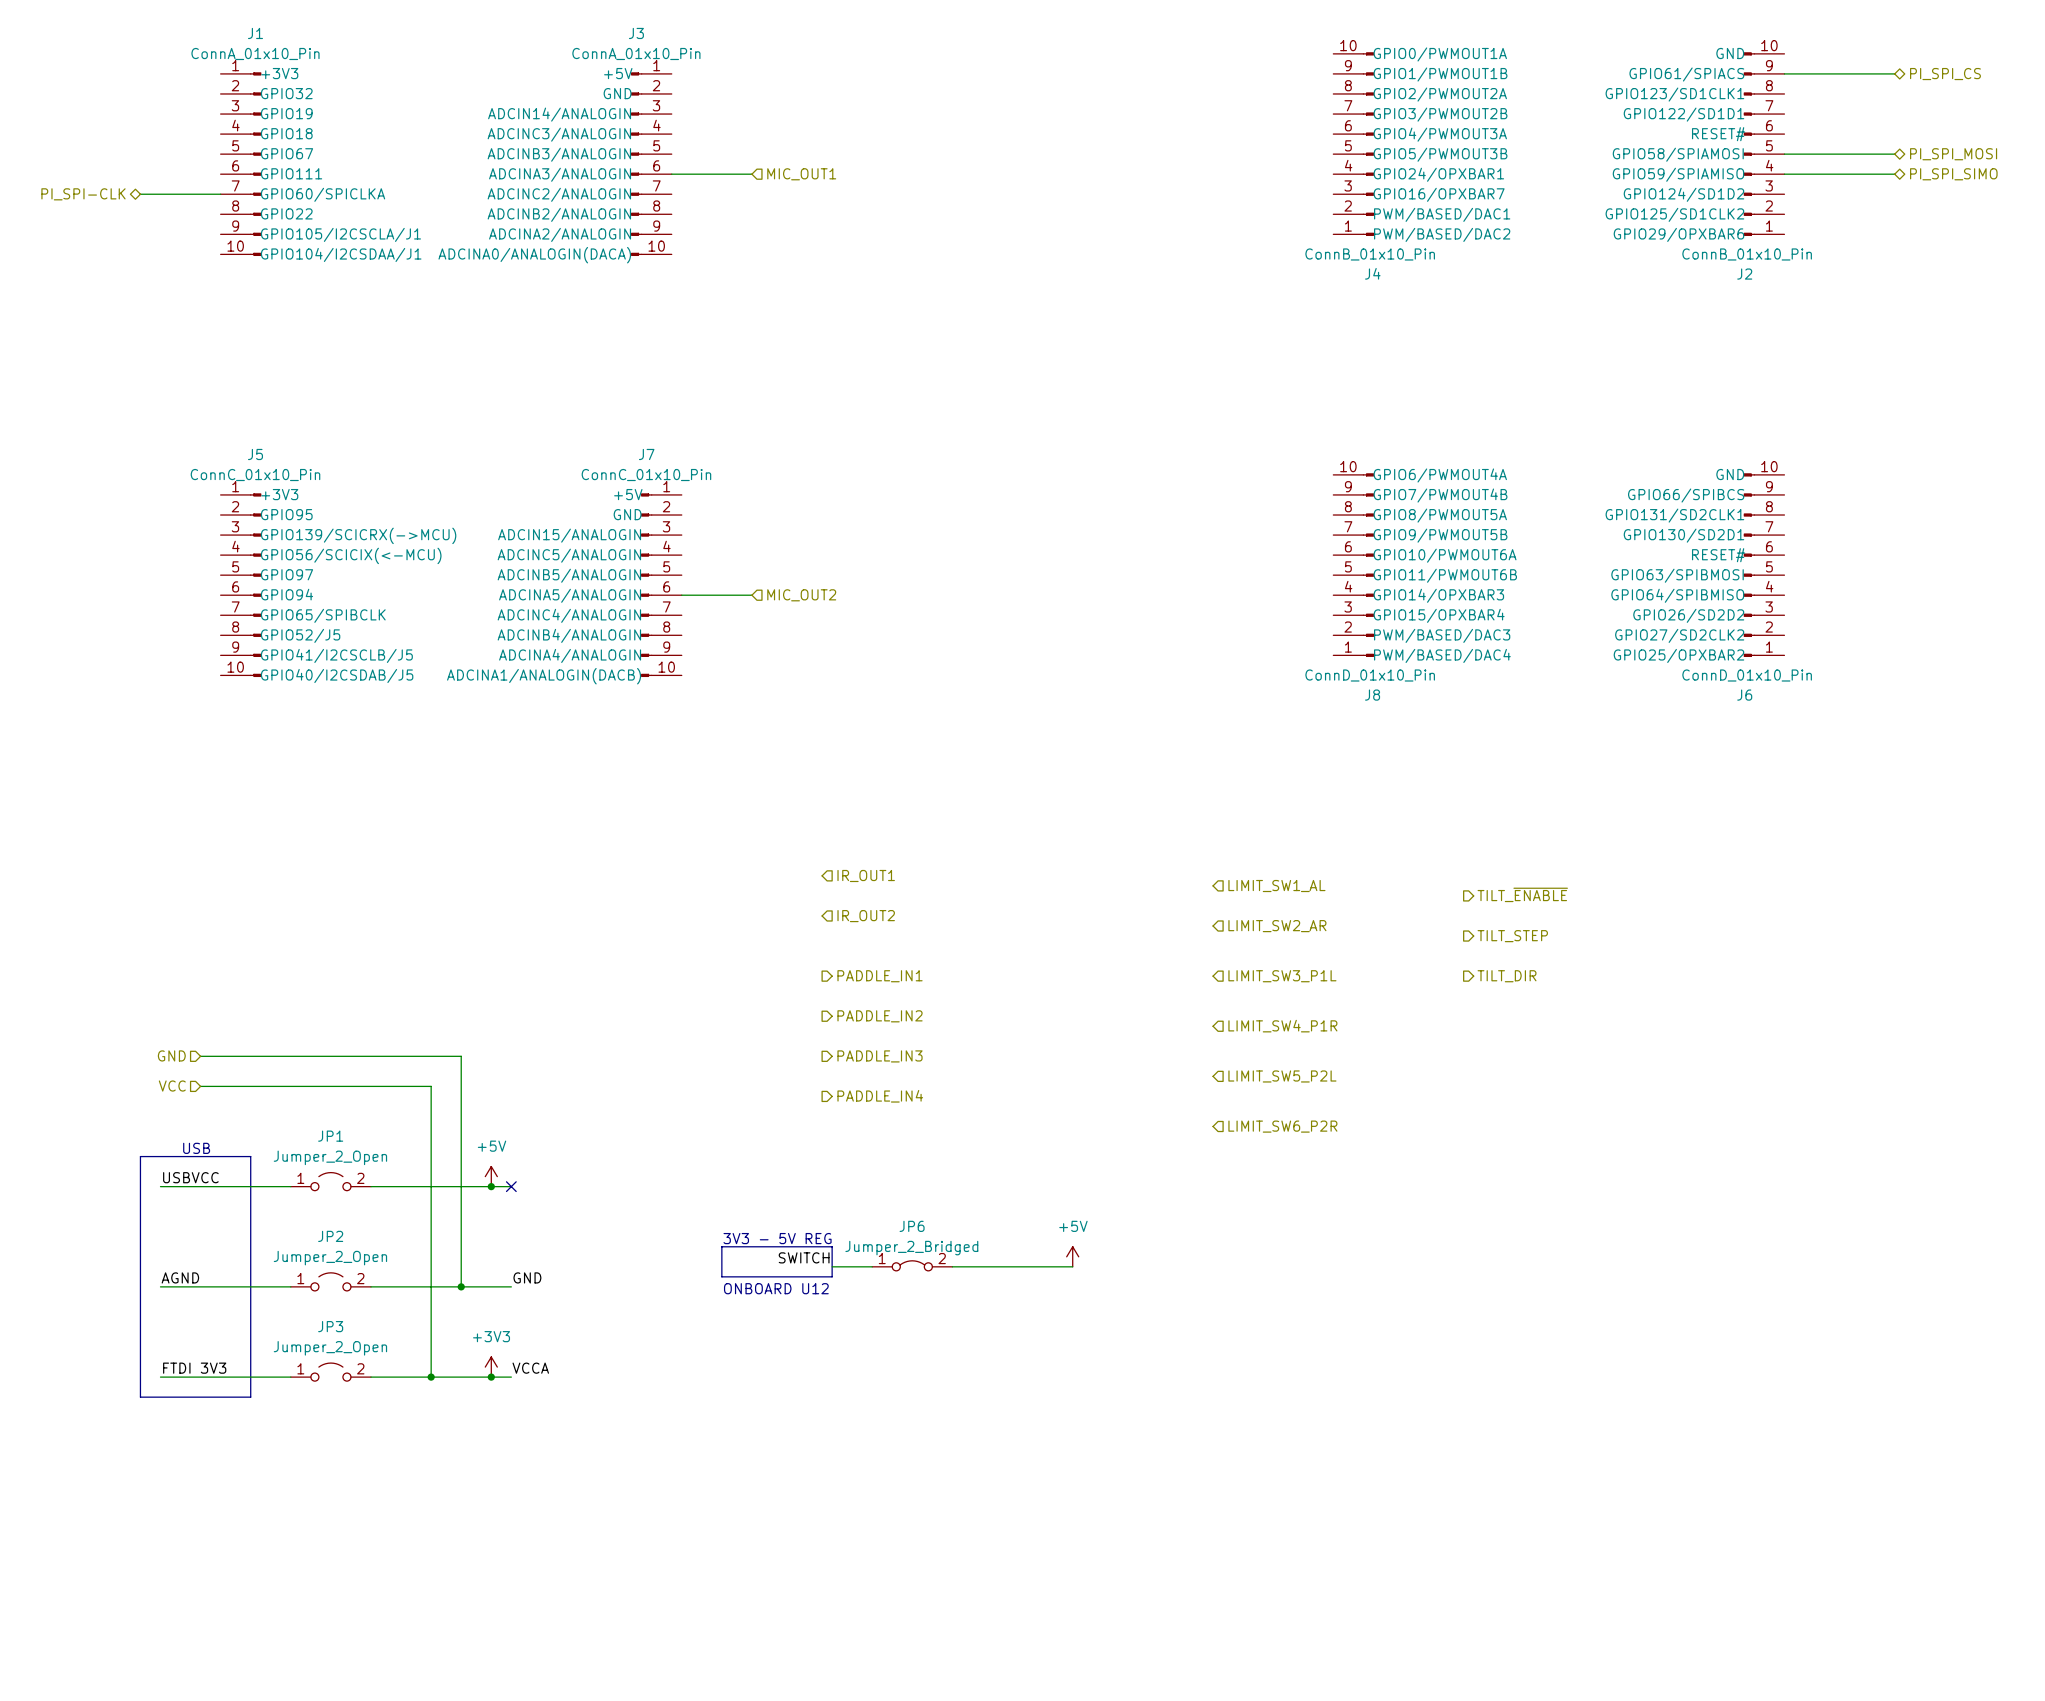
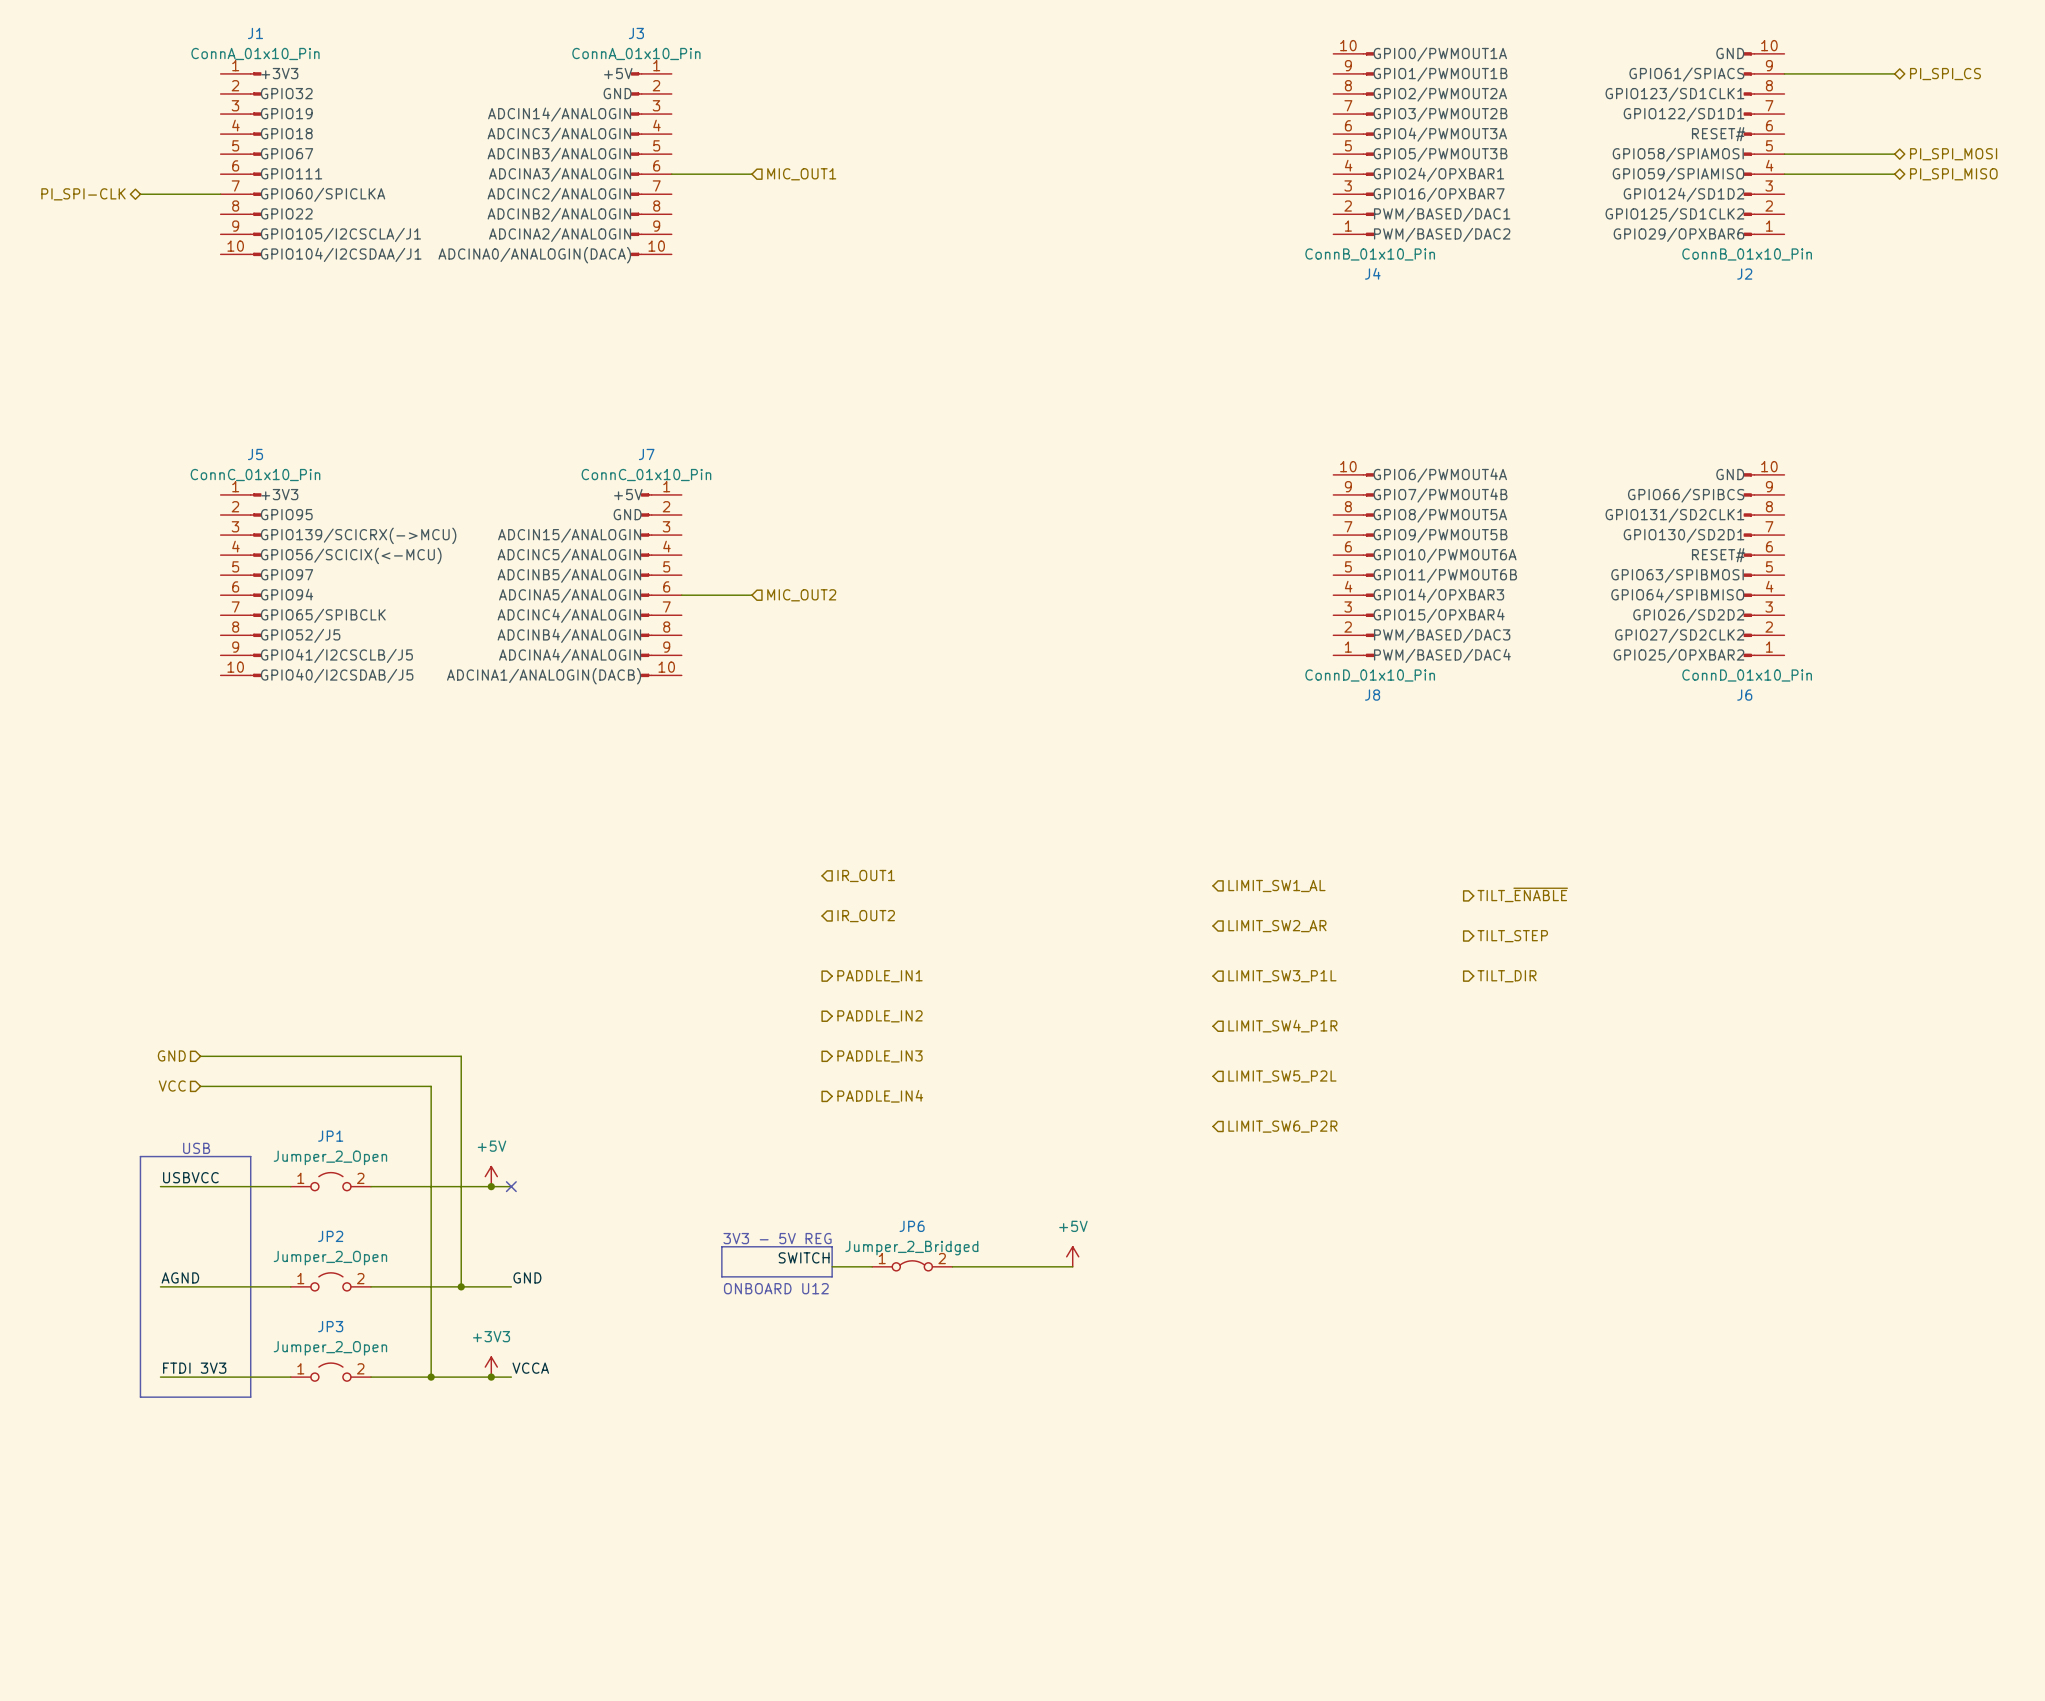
hierarchical label: PI_SPI_SIMO (1953, 174) -> PI_SPI_MISO (1953, 174)

